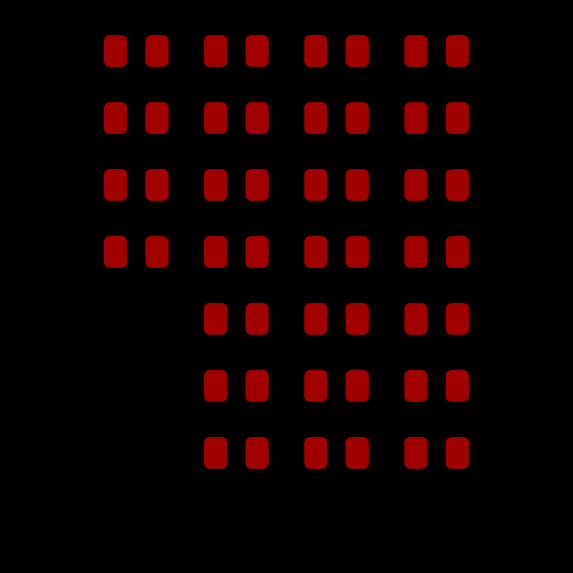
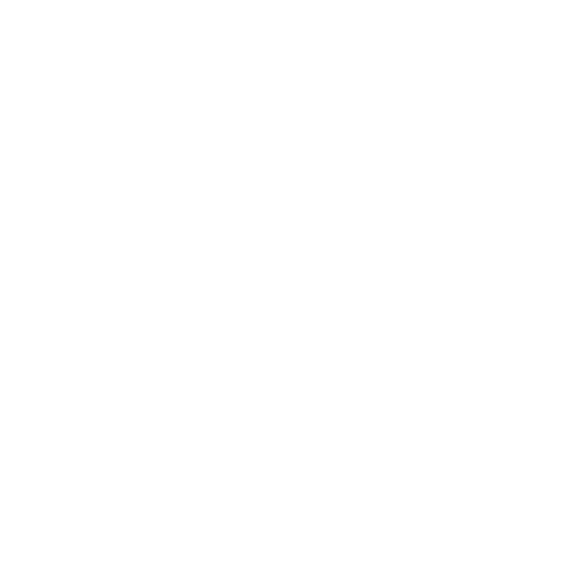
part: (136, 51) -> none
part: (236, 51) -> none
part: (336, 51) -> none
part: (436, 51) -> none
part: (136, 118) -> none
part: (236, 118) -> none
part: (336, 118) -> none
part: (436, 118) -> none
part: (136, 184) -> none
part: (236, 184) -> none
part: (336, 184) -> none
part: (436, 184) -> none
part: (136, 251) -> none
part: (236, 251) -> none
part: (336, 251) -> none
part: (436, 251) -> none
part: (236, 318) -> none
part: (336, 318) -> none
part: (436, 318) -> none
part: (236, 385) -> none
part: (336, 385) -> none
part: (436, 385) -> none
part: (236, 452) -> none
part: (336, 452) -> none
part: (436, 452) -> none

